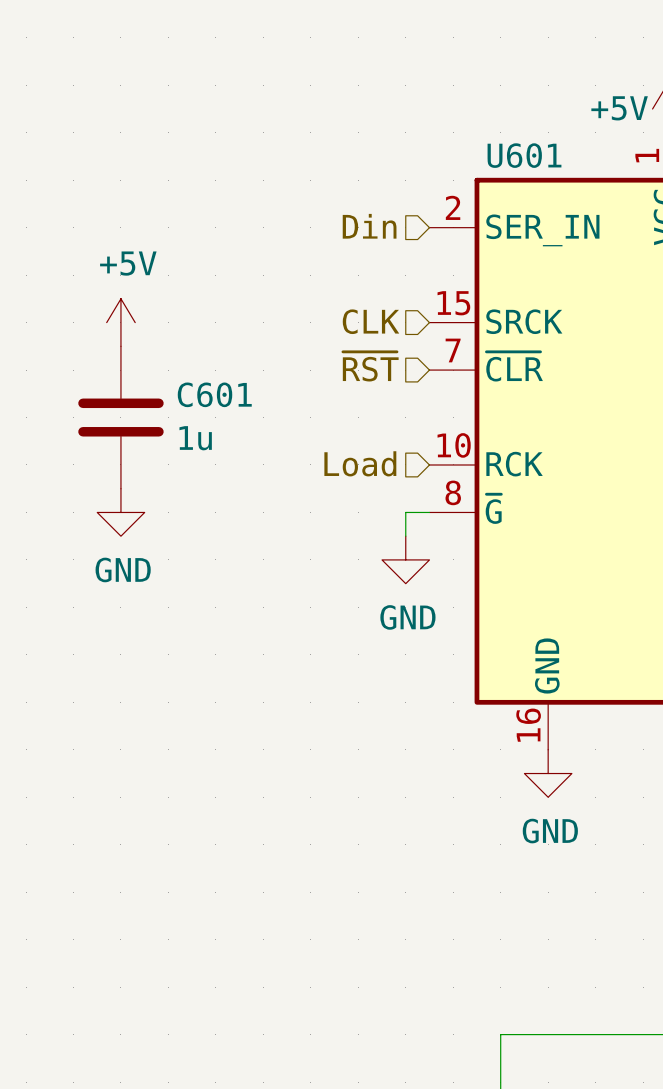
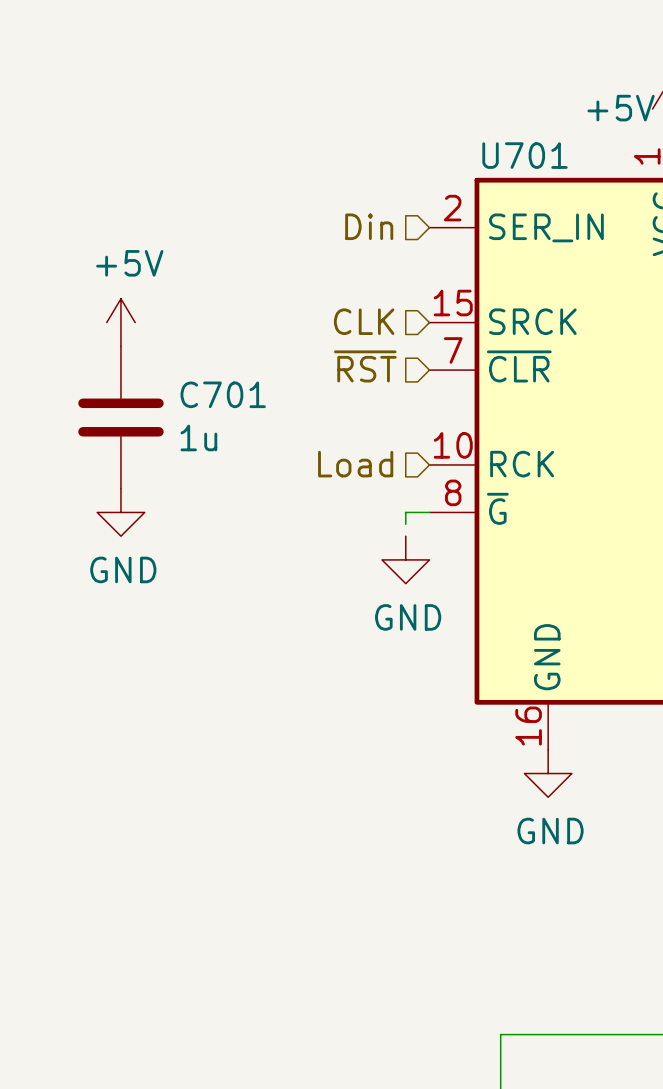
U601 name: U601 (524, 155) -> U701 (524, 155)
C601 name: C601 (214, 394) -> C701 (223, 394)
wire: (405, 524) (405, 536) -> none

